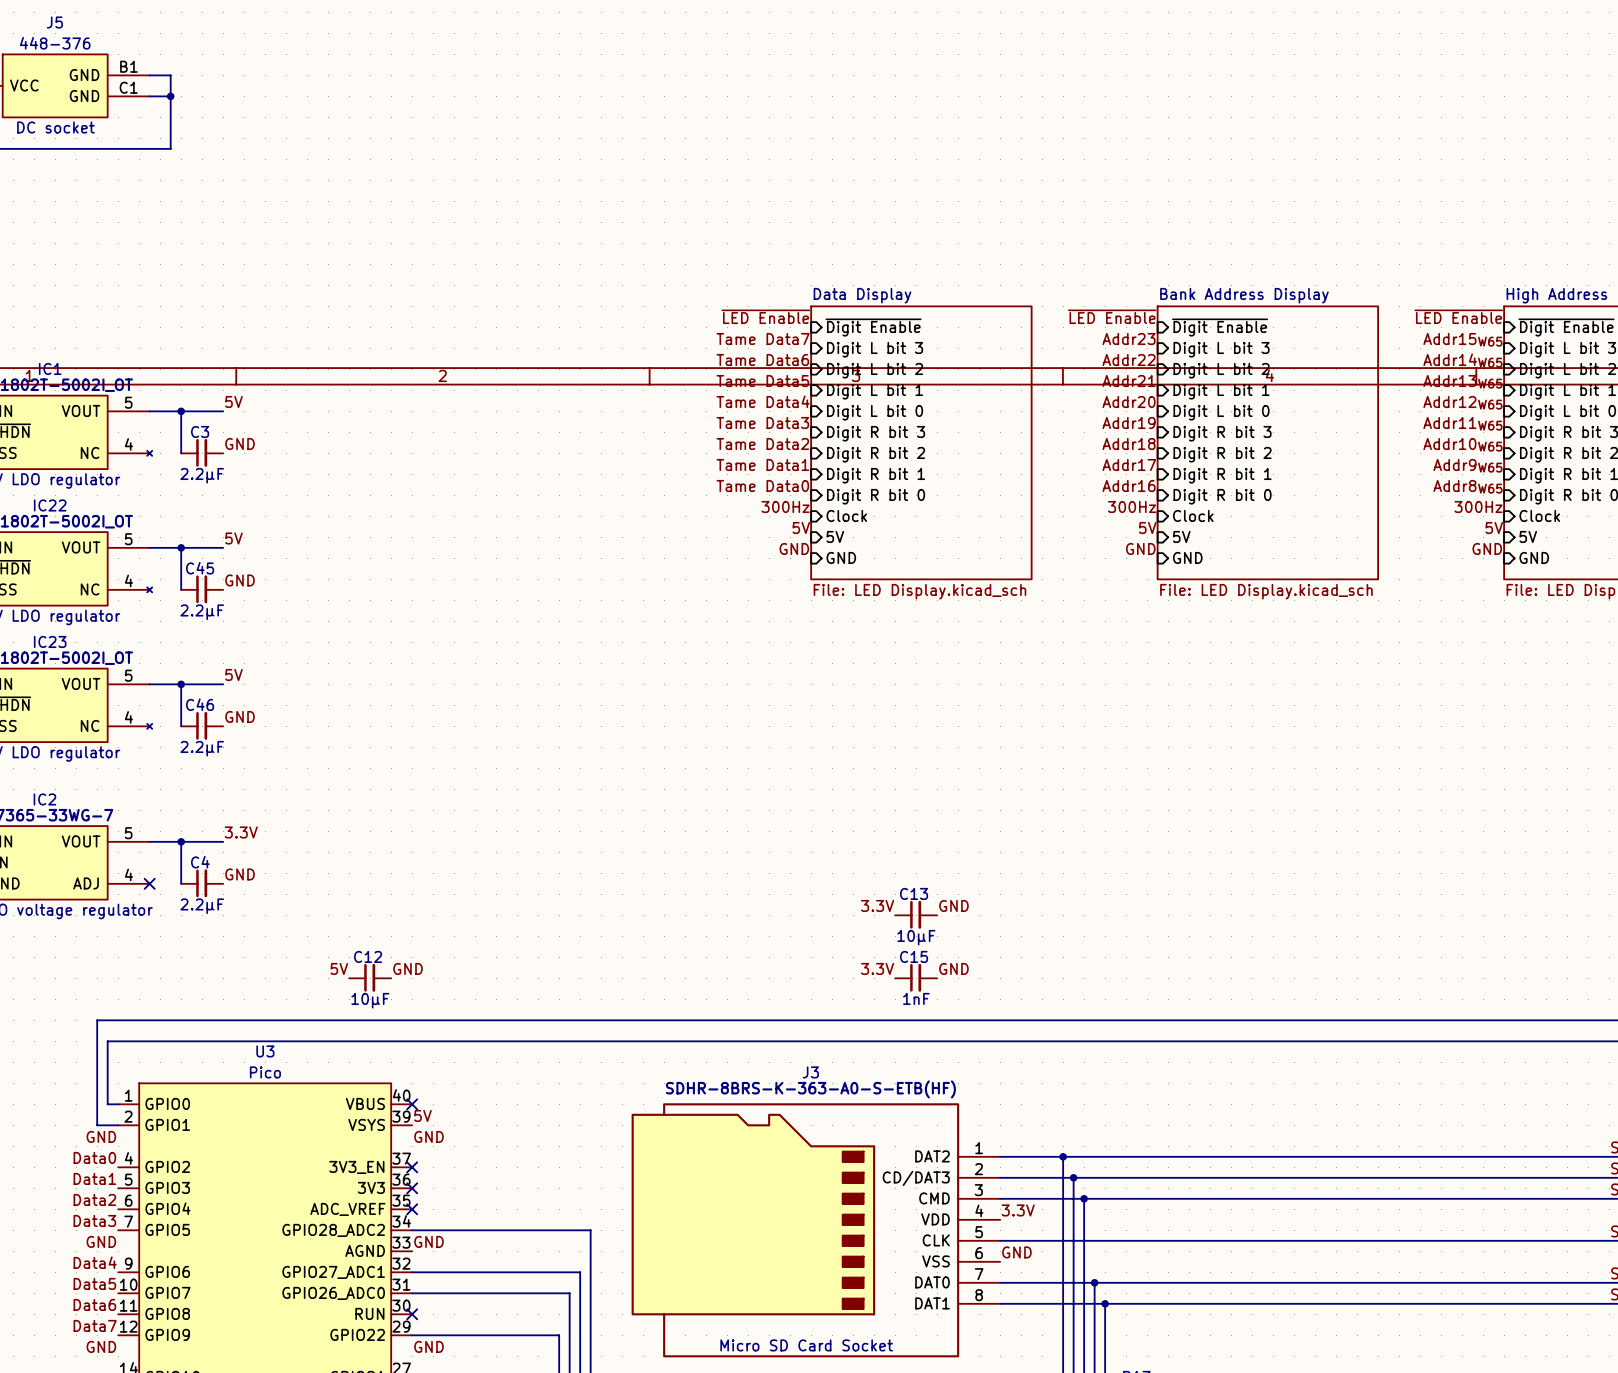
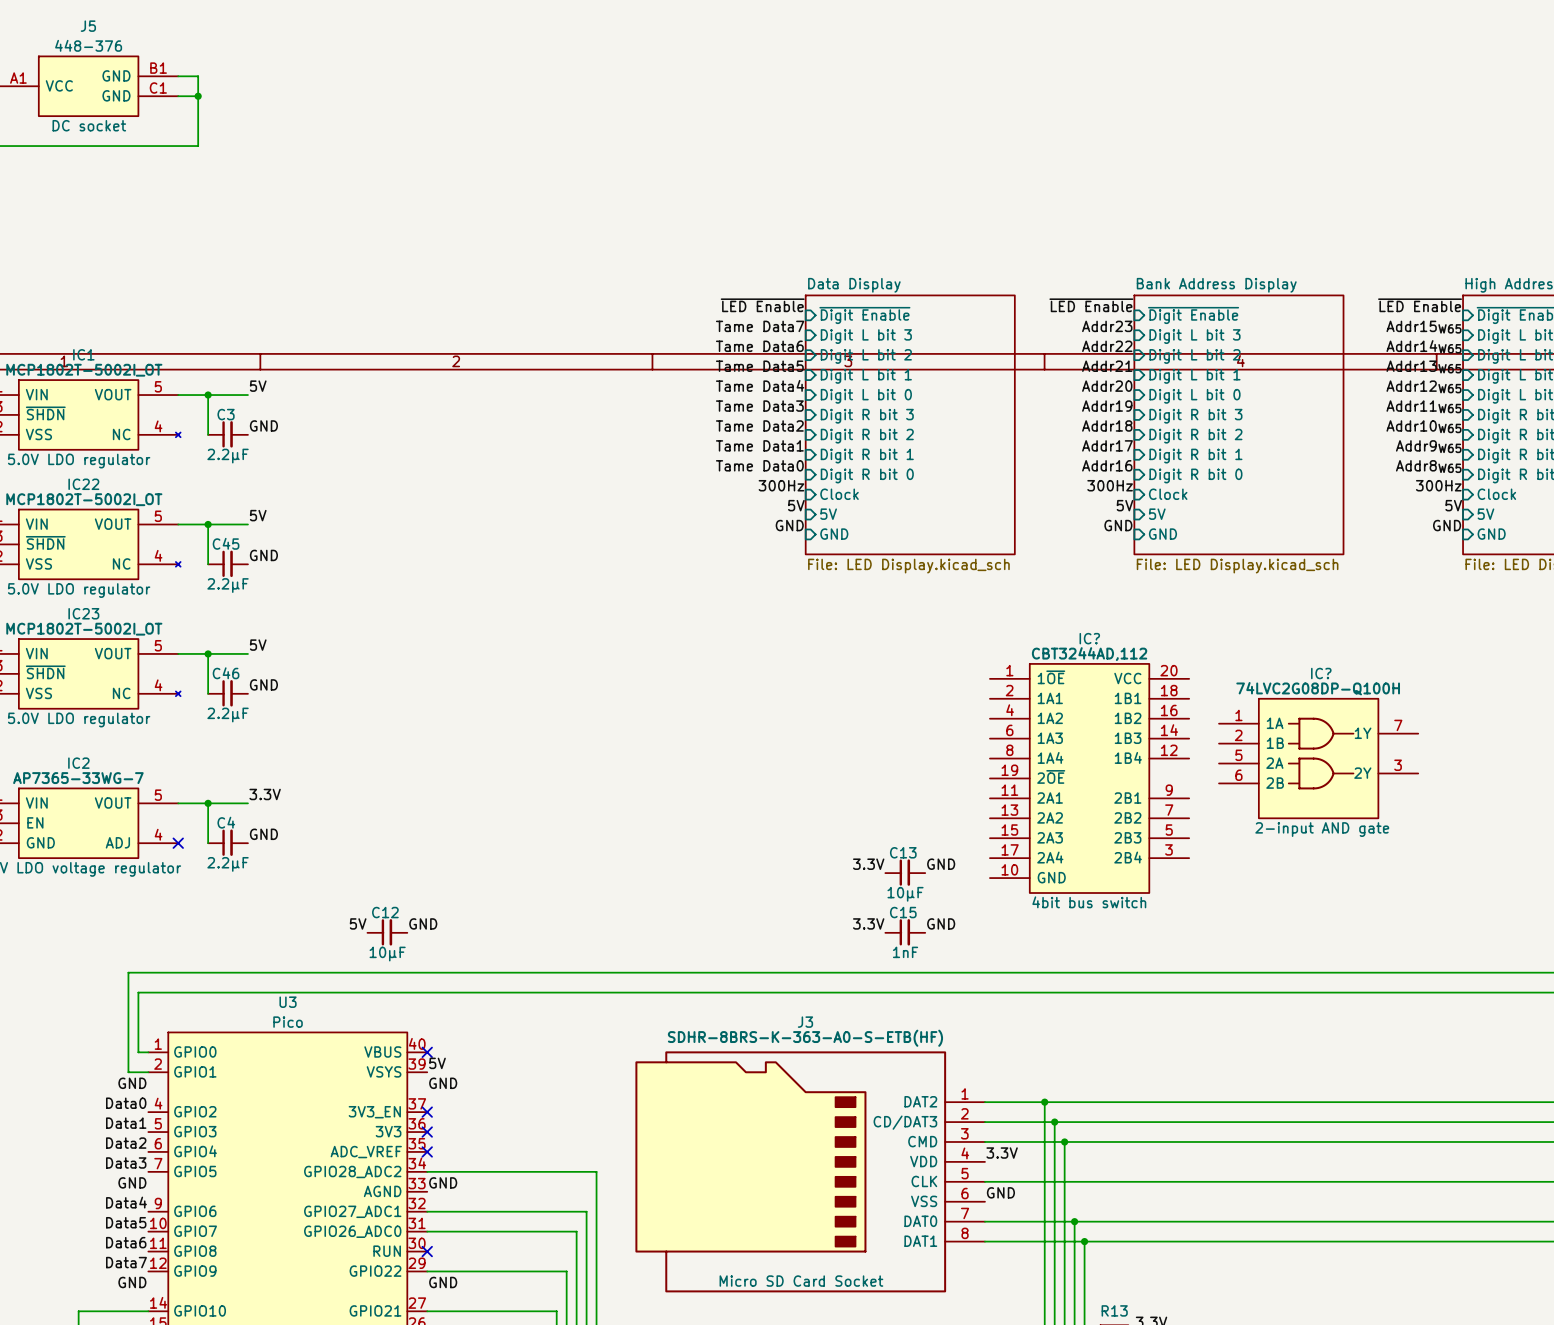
IC?: none -> 74LVC2G08DP-Q100H (1318, 758)
IC?: none -> CBT3244AD,112 (1089, 778)

